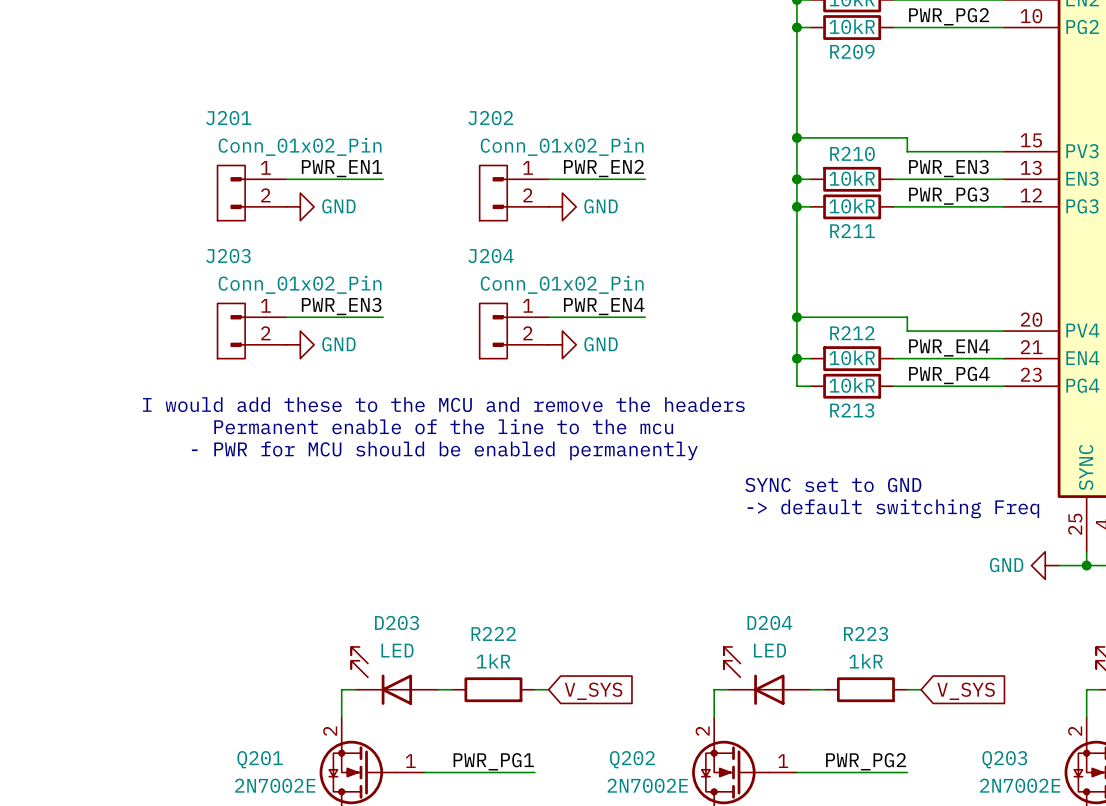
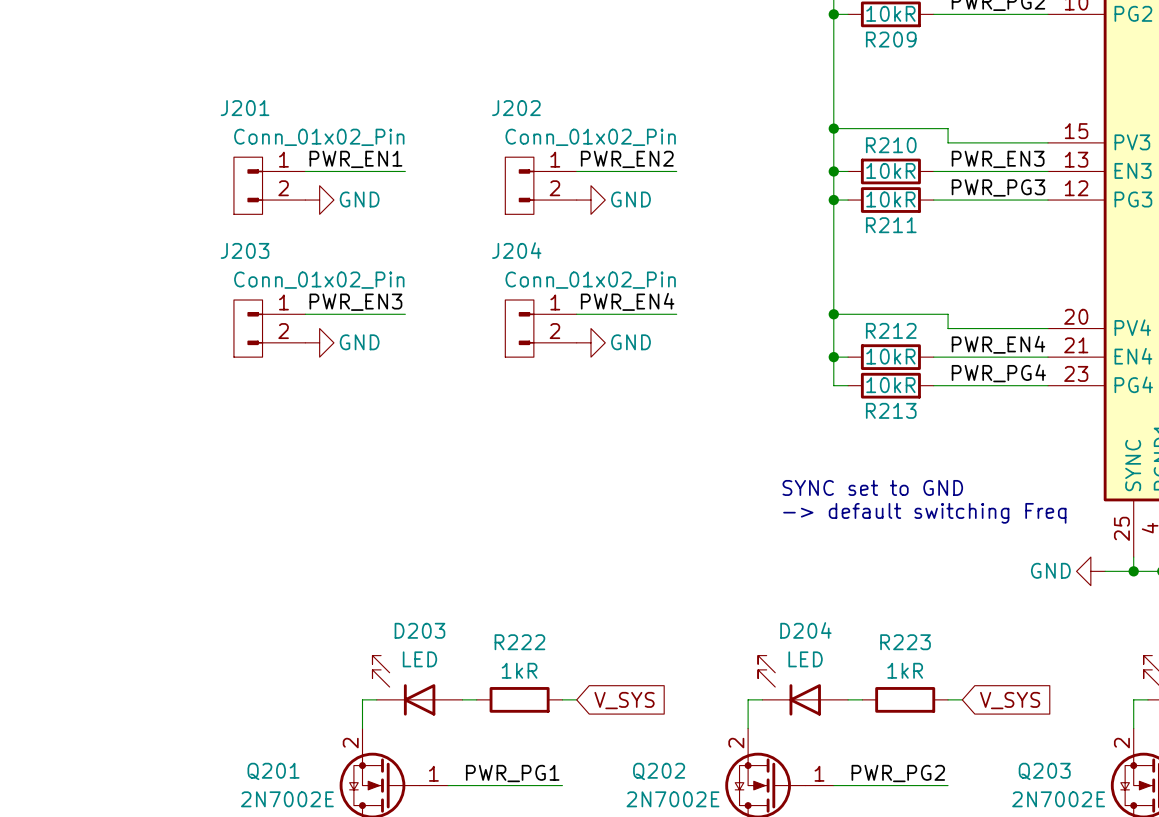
text: I would add these to the MCU and remove the headers (443, 404) -> none
text: Permanent enable of the line to the mcu (443, 426) -> none
text: - PWR for MCU should be enabled permanently (444, 450) -> none

